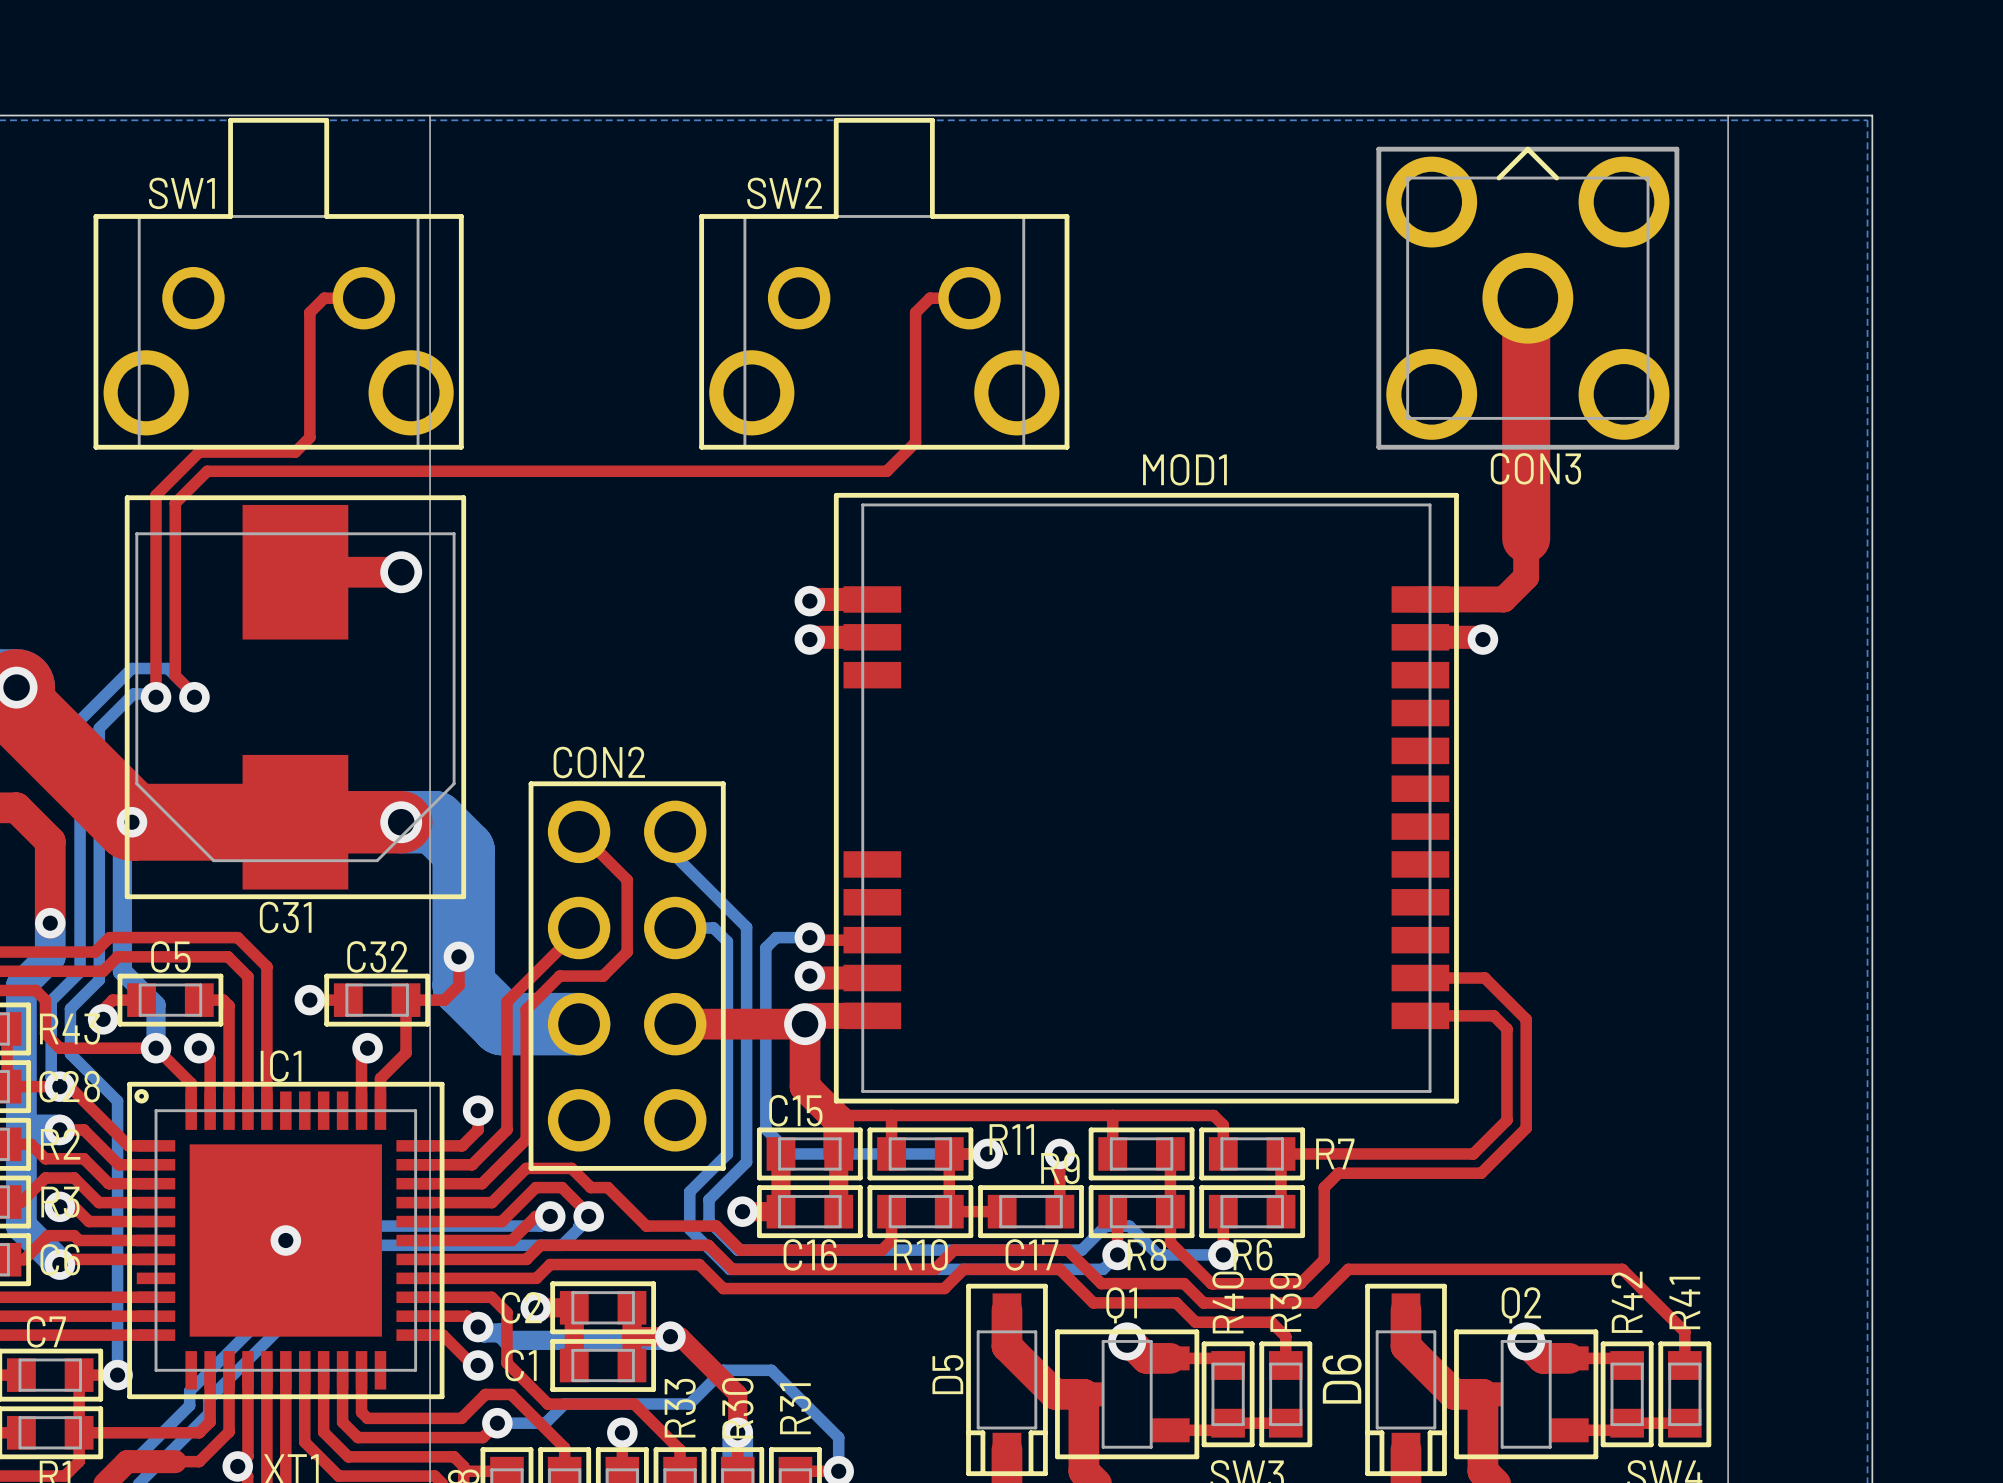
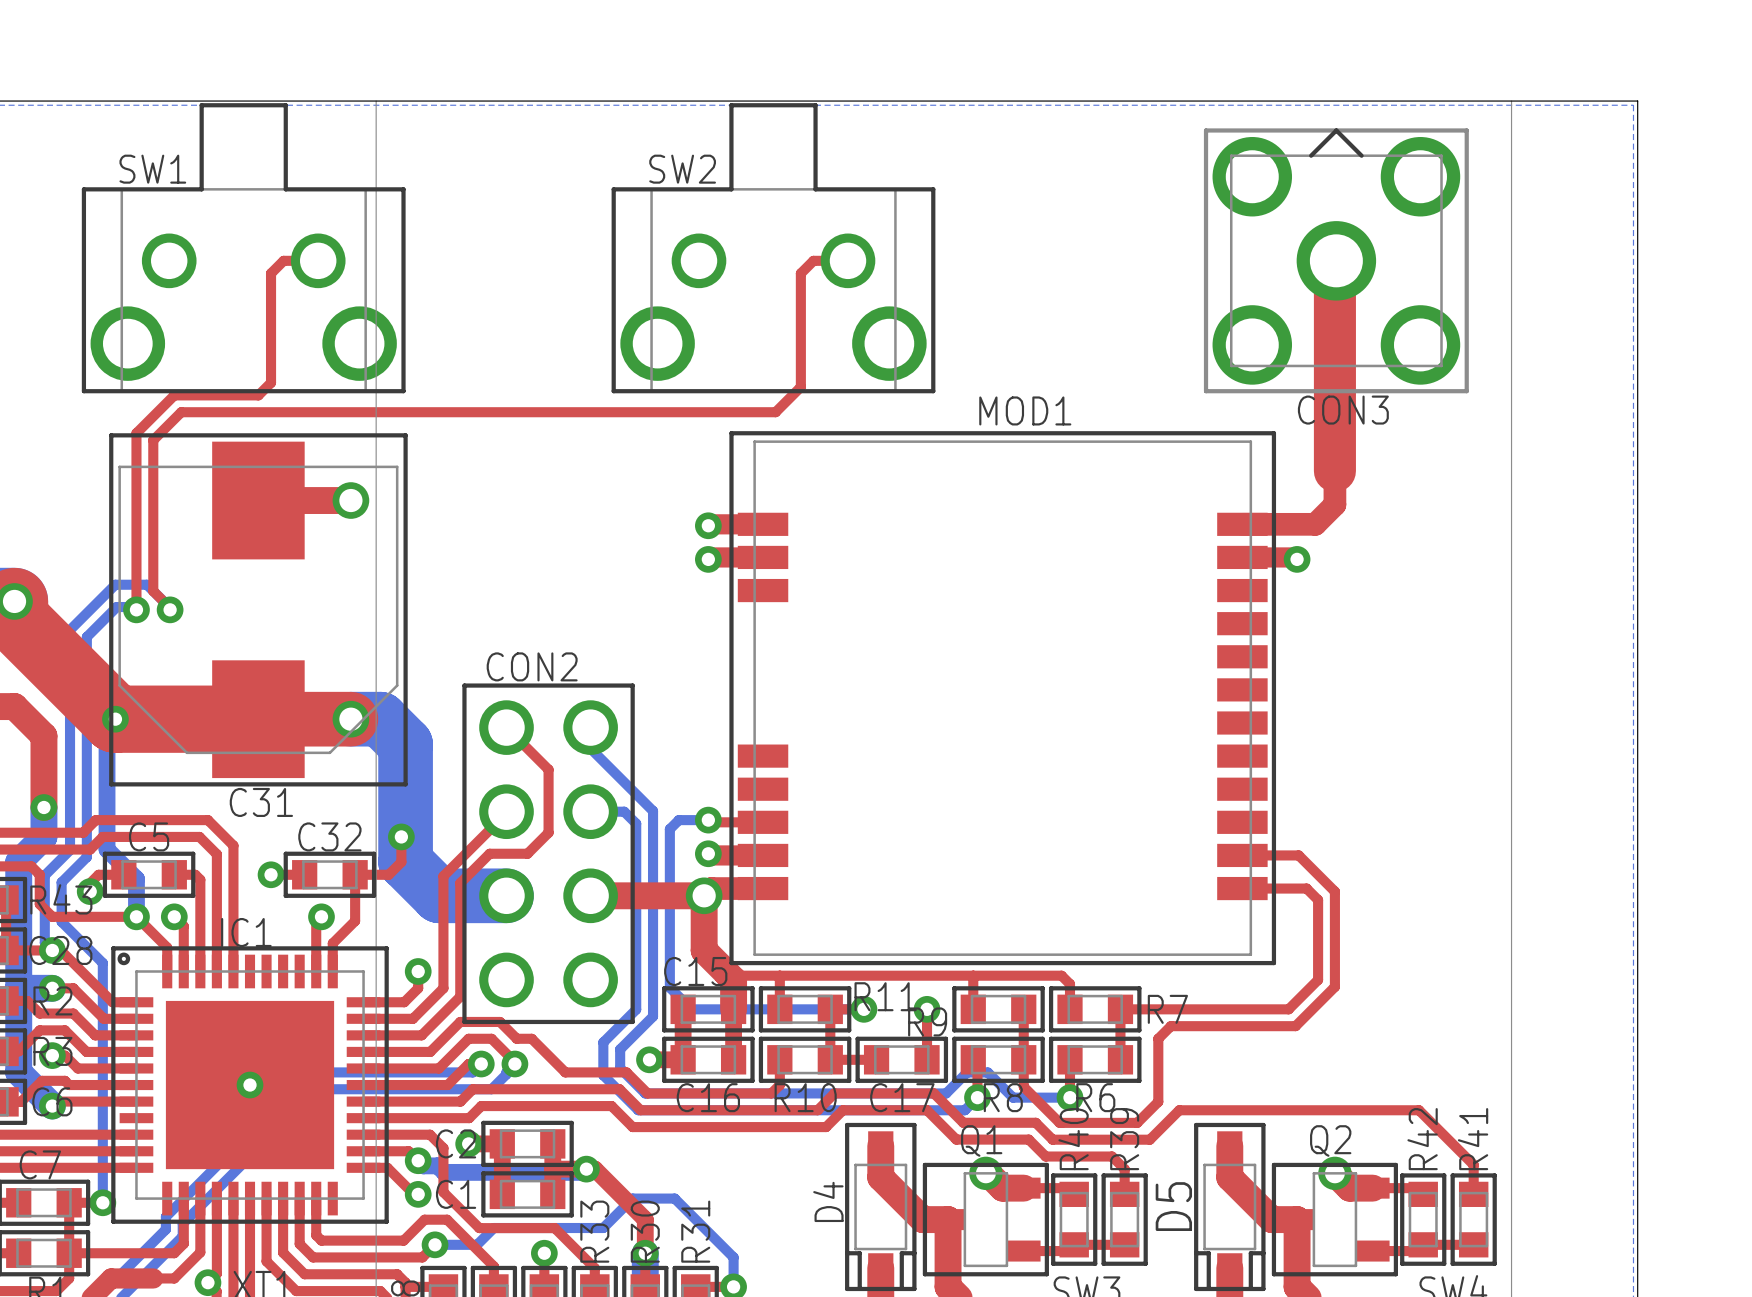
D5 name: D5 (947, 1374) -> D4 (828, 1201)
D6 name: D6 (1342, 1379) -> D5 (1173, 1206)

